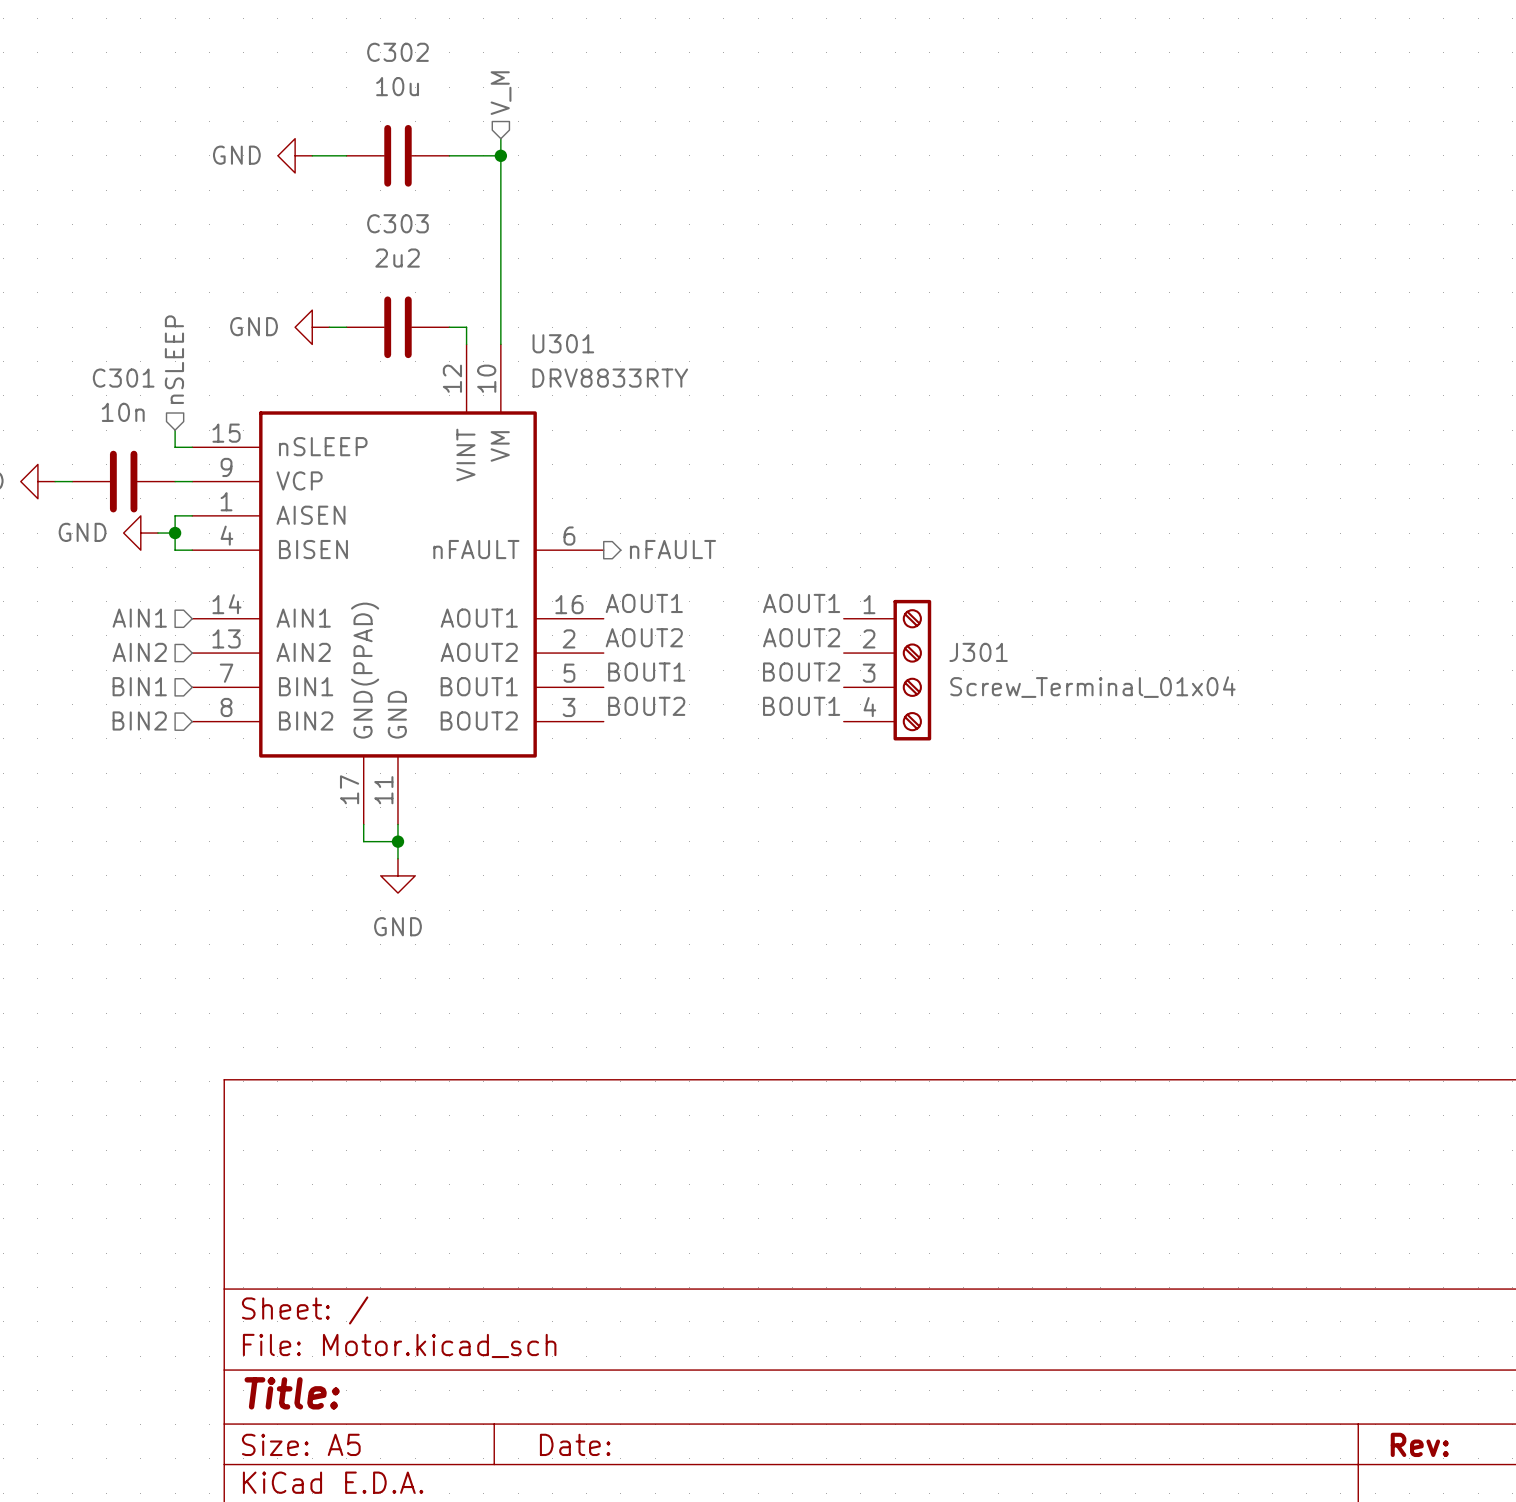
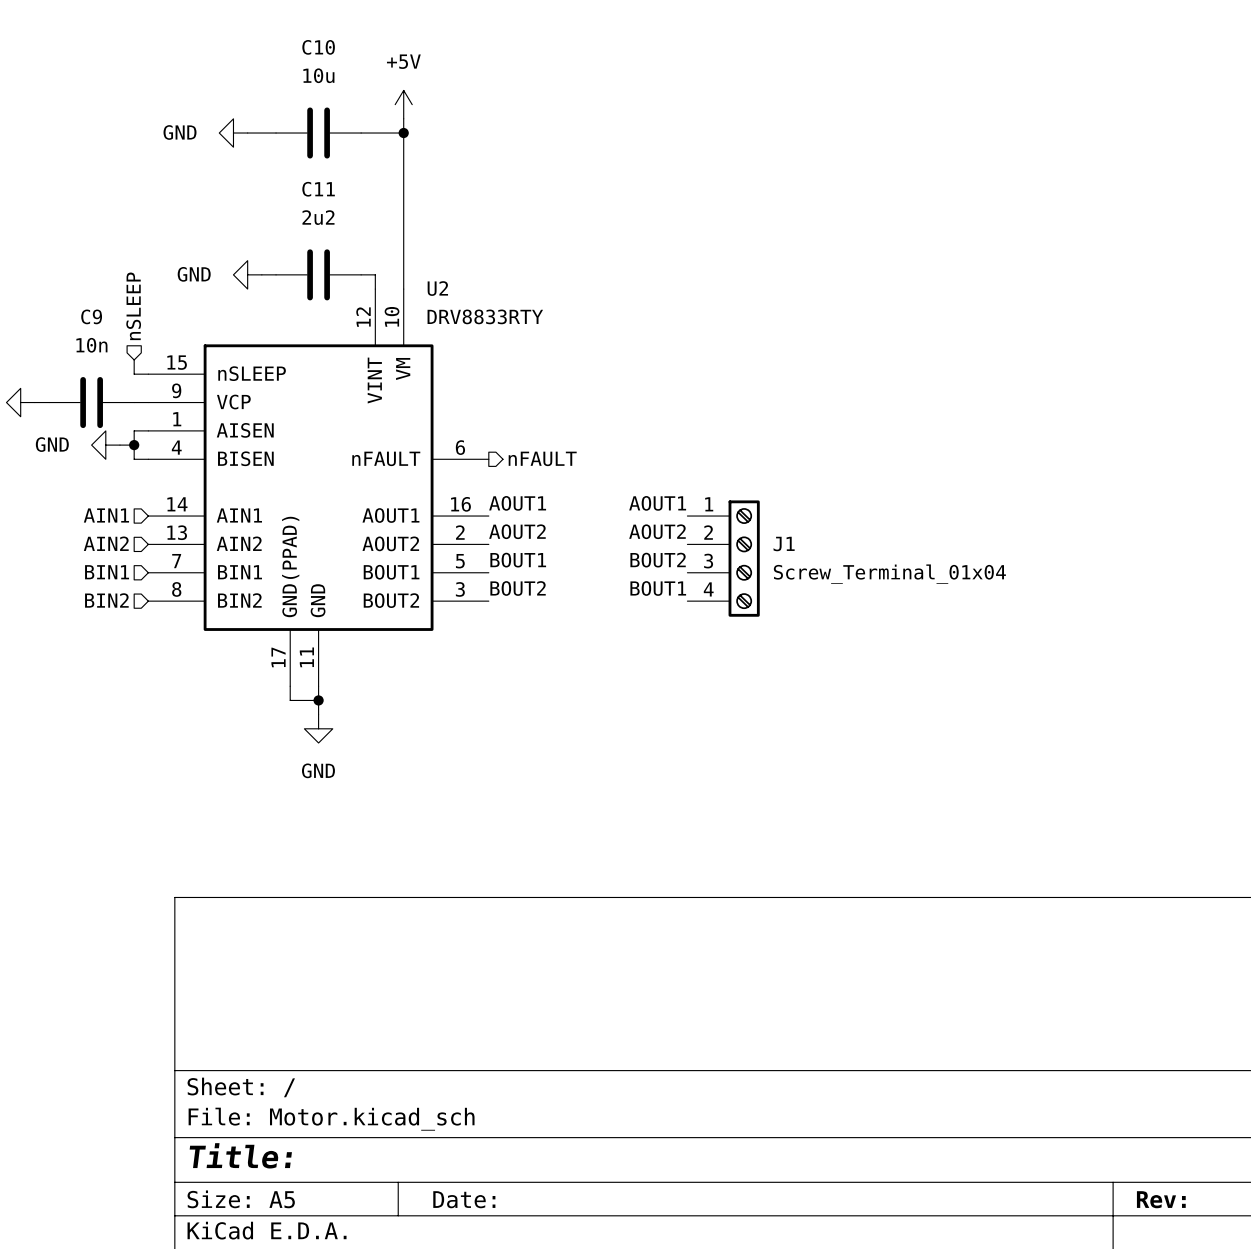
C302 name: C302 (397, 52) -> C10 (318, 47)
hierarchical label: V_M (501, 93) -> none
power symbol: none -> +5V (403, 104)
C303 name: C303 (397, 223) -> C11 (318, 189)
U301 name: U301 (563, 343) -> U2 (437, 288)
C301 name: C301 (123, 378) -> C9 (91, 316)
J301 name: J301 (978, 652) -> J1 (784, 544)

